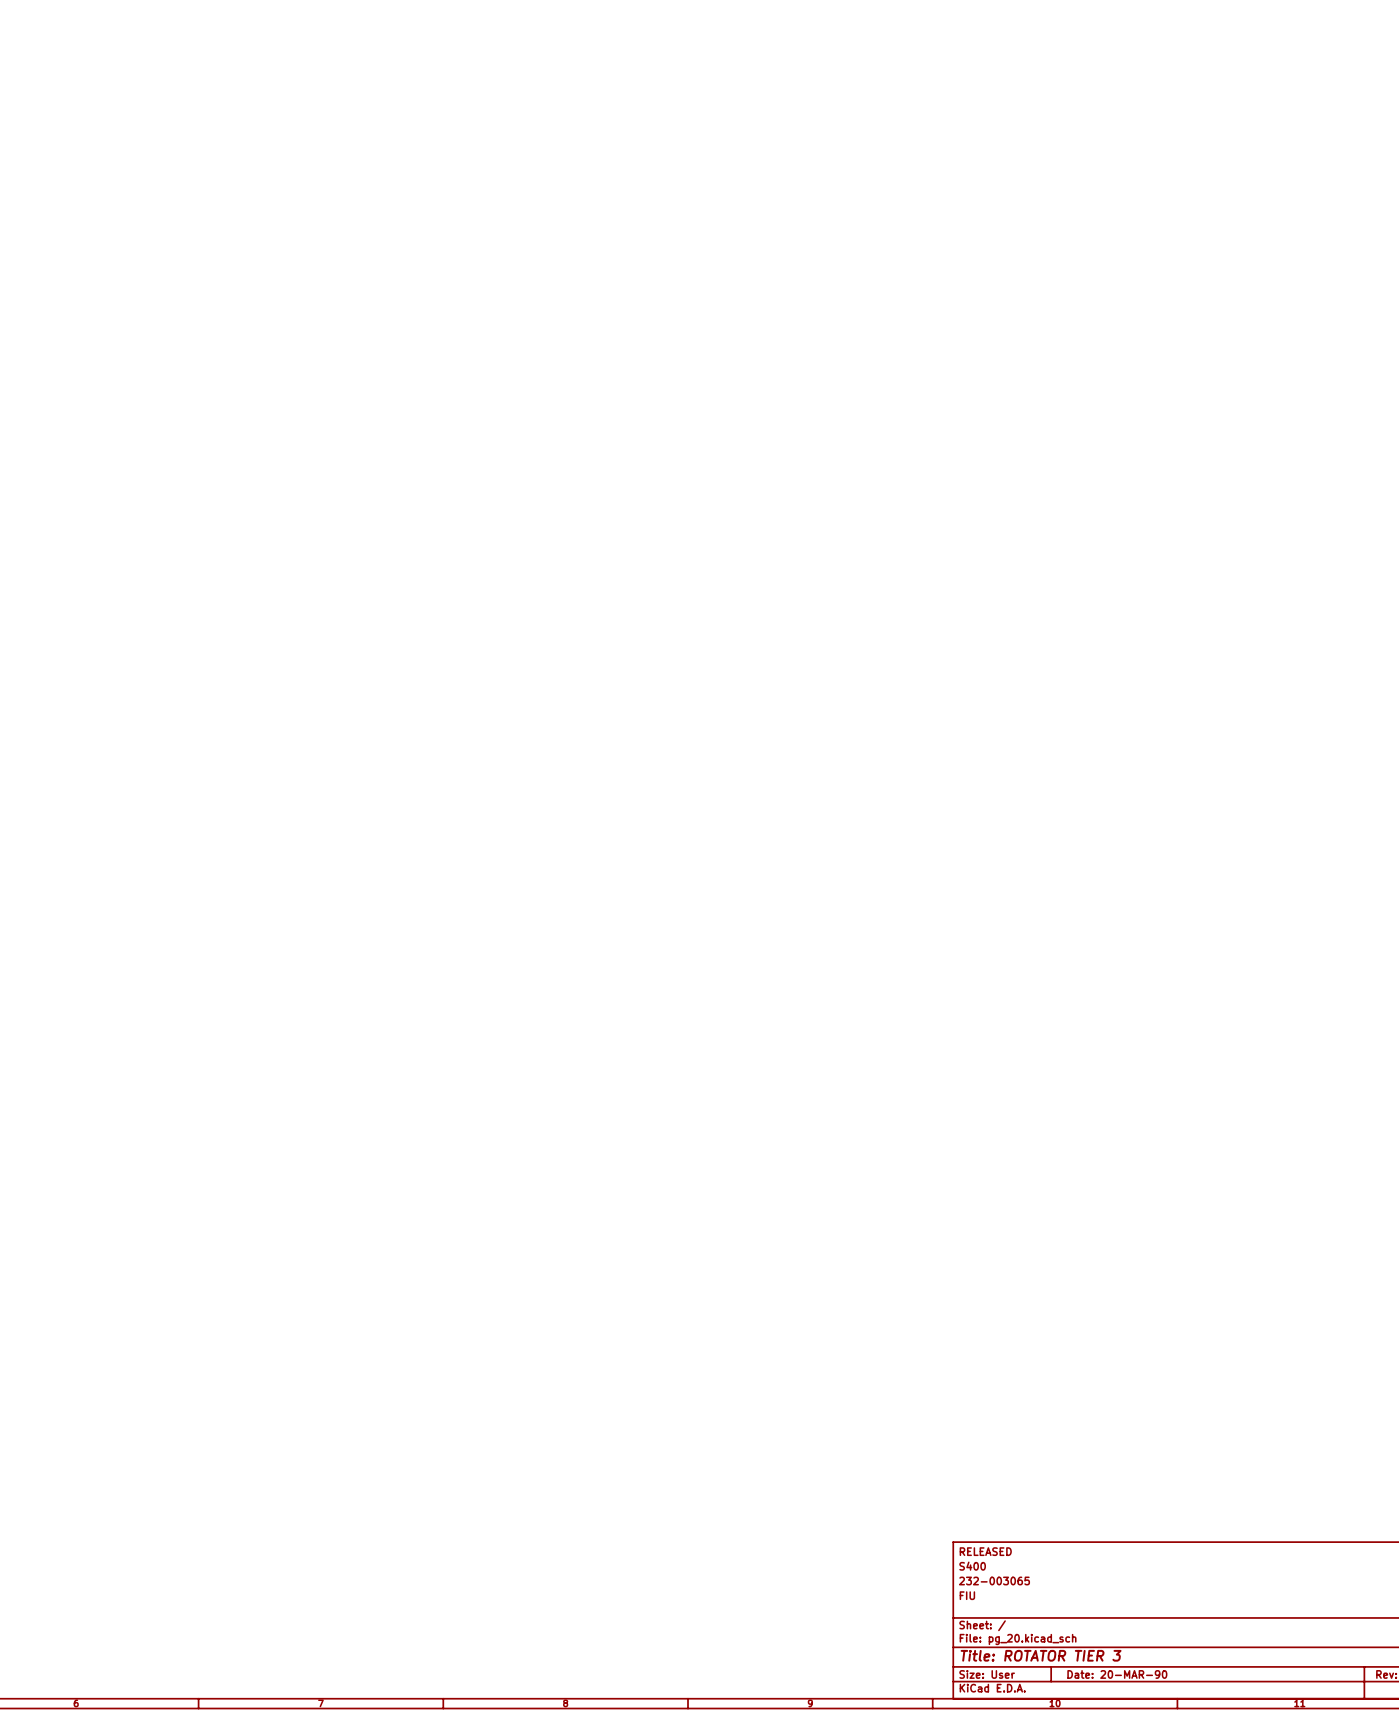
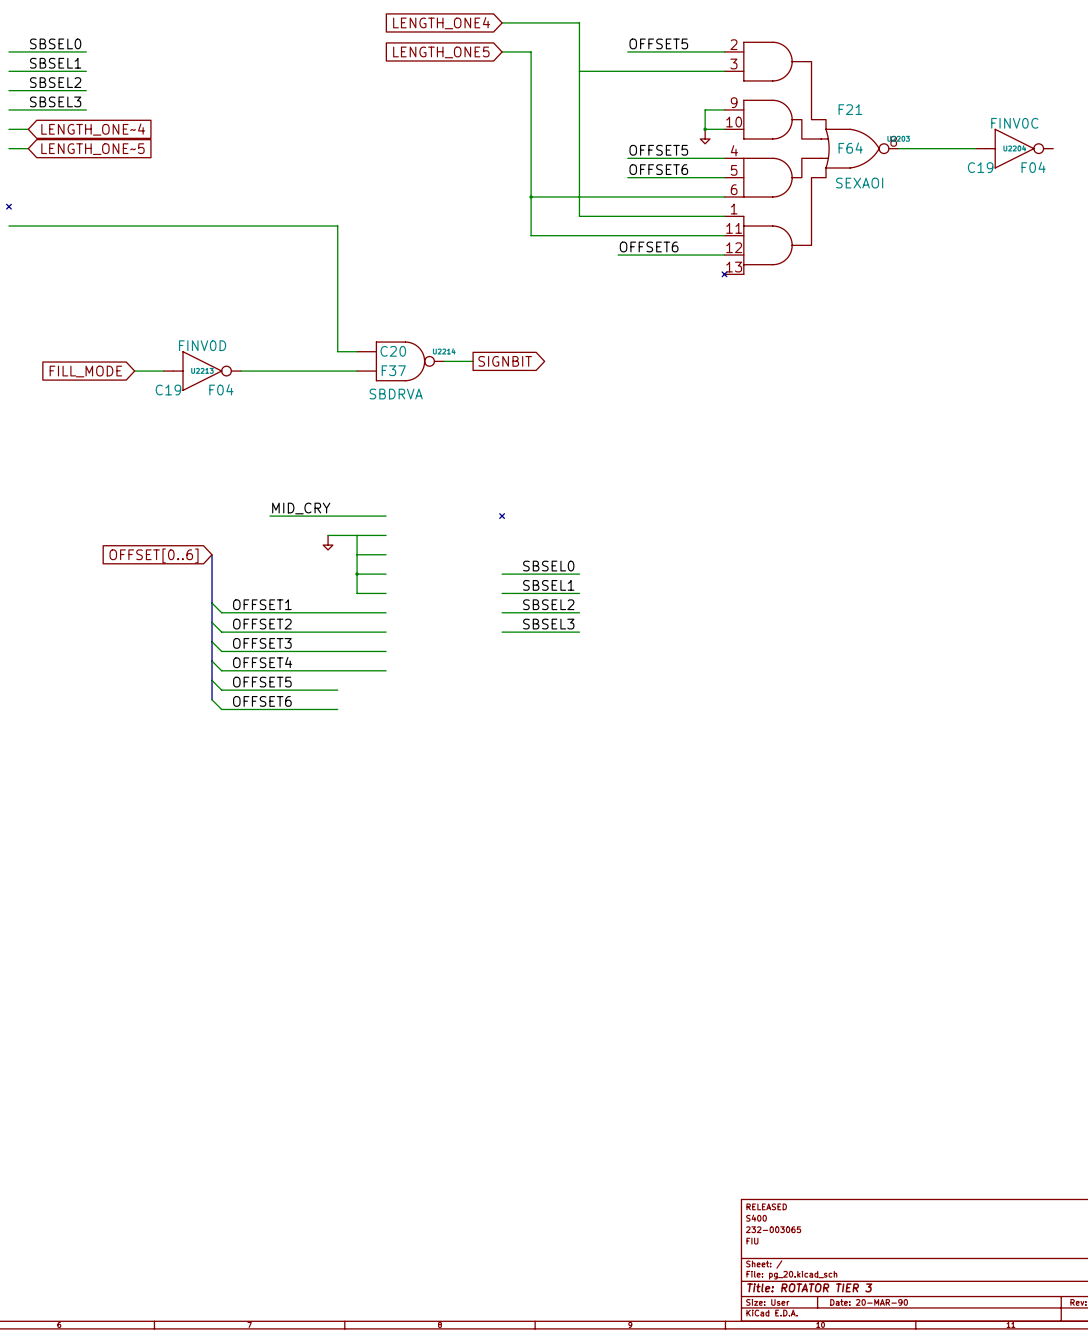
global label: none -> LENGTH_ONE4 (441, 23)
wire: none -> (502, 22) (579, 22) (579, 216) (724, 216)
label: none -> SBSEL0 (55, 43)
label: none -> OFFSET5 (658, 43)
wire: none -> (8, 51) (86, 51)
wire: none -> (502, 51) (531, 51) (531, 235) (724, 235)
wire: none -> (627, 51) (724, 51)
global label: none -> LENGTH_ONE5 (441, 52)
label: none -> SBSEL1 (55, 63)
wire: none -> (8, 71) (86, 71)
wire: none -> (579, 71) (724, 71)
label: none -> SBSEL2 (55, 82)
wire: none -> (8, 90) (86, 90)
label: none -> SBSEL3 (55, 101)
wire: none -> (8, 109) (86, 109)
wire: none -> (724, 109) (705, 109) (705, 129) (724, 129)
wire: none -> (8, 129) (28, 129)
global label: none -> LENGTH_ONE~4 (93, 129)
junction: none -> (705, 129)
power symbol: none -> (705, 136)
wire: none -> (8, 148) (28, 148)
global label: none -> LENGTH_ONE~5 (92, 149)
wire: none -> (898, 148) (975, 148)
part: none -> F04 (1014, 148)
label: none -> OFFSET5 (658, 150)
wire: none -> (627, 158) (724, 158)
part: none -> F64 (811, 158)
label: none -> OFFSET6 (658, 169)
wire: none -> (627, 177) (724, 177)
wire: none -> (531, 197) (724, 197)
junction: none -> (531, 197)
no-connect mark: none -> (8, 206)
wire: none -> (8, 226) (337, 226) (337, 351) (357, 351)
label: none -> OFFSET6 (649, 246)
wire: none -> (618, 255) (724, 255)
no-connect mark: none -> (724, 274)
part: none -> F37 (400, 361)
wire: none -> (444, 361) (473, 361)
global label: none -> SIGNBIT (505, 361)
global label: none -> FILL_MODE (85, 371)
wire: none -> (134, 371) (163, 371)
part: none -> F04 (202, 371)
wire: none -> (241, 371) (357, 371)
label: none -> MID_CRY (301, 508)
wire: none -> (270, 516) (386, 516)
no-connect mark: none -> (502, 516)
wire: none -> (328, 535) (386, 535)
wire: none -> (357, 535) (357, 593) (386, 593)
power symbol: none -> (328, 542)
bus: none -> (212, 554) (212, 699)
wire: none -> (357, 554) (386, 554)
global label: none -> OFFSET[0..6] (154, 555)
label: none -> SBSEL0 (548, 566)
wire: none -> (357, 574) (386, 574)
junction: none -> (357, 574)
wire: none -> (502, 574) (579, 574)
label: none -> SBSEL1 (548, 585)
wire: none -> (502, 593) (579, 593)
wire: none -> (212, 603) (221, 612) (386, 612)
label: none -> OFFSET1 (262, 604)
label: none -> SBSEL2 (548, 604)
wire: none -> (502, 612) (579, 612)
wire: none -> (212, 622) (221, 632) (386, 632)
label: none -> OFFSET2 (262, 624)
label: none -> SBSEL3 (548, 624)
wire: none -> (502, 632) (579, 632)
wire: none -> (212, 641) (221, 651) (386, 651)
label: none -> OFFSET3 (262, 643)
wire: none -> (212, 661) (221, 670) (386, 670)
label: none -> OFFSET4 (262, 662)
wire: none -> (212, 680) (221, 690) (337, 690)
label: none -> OFFSET5 (262, 682)
wire: none -> (212, 699) (221, 709) (337, 709)
label: none -> OFFSET6 (262, 701)

